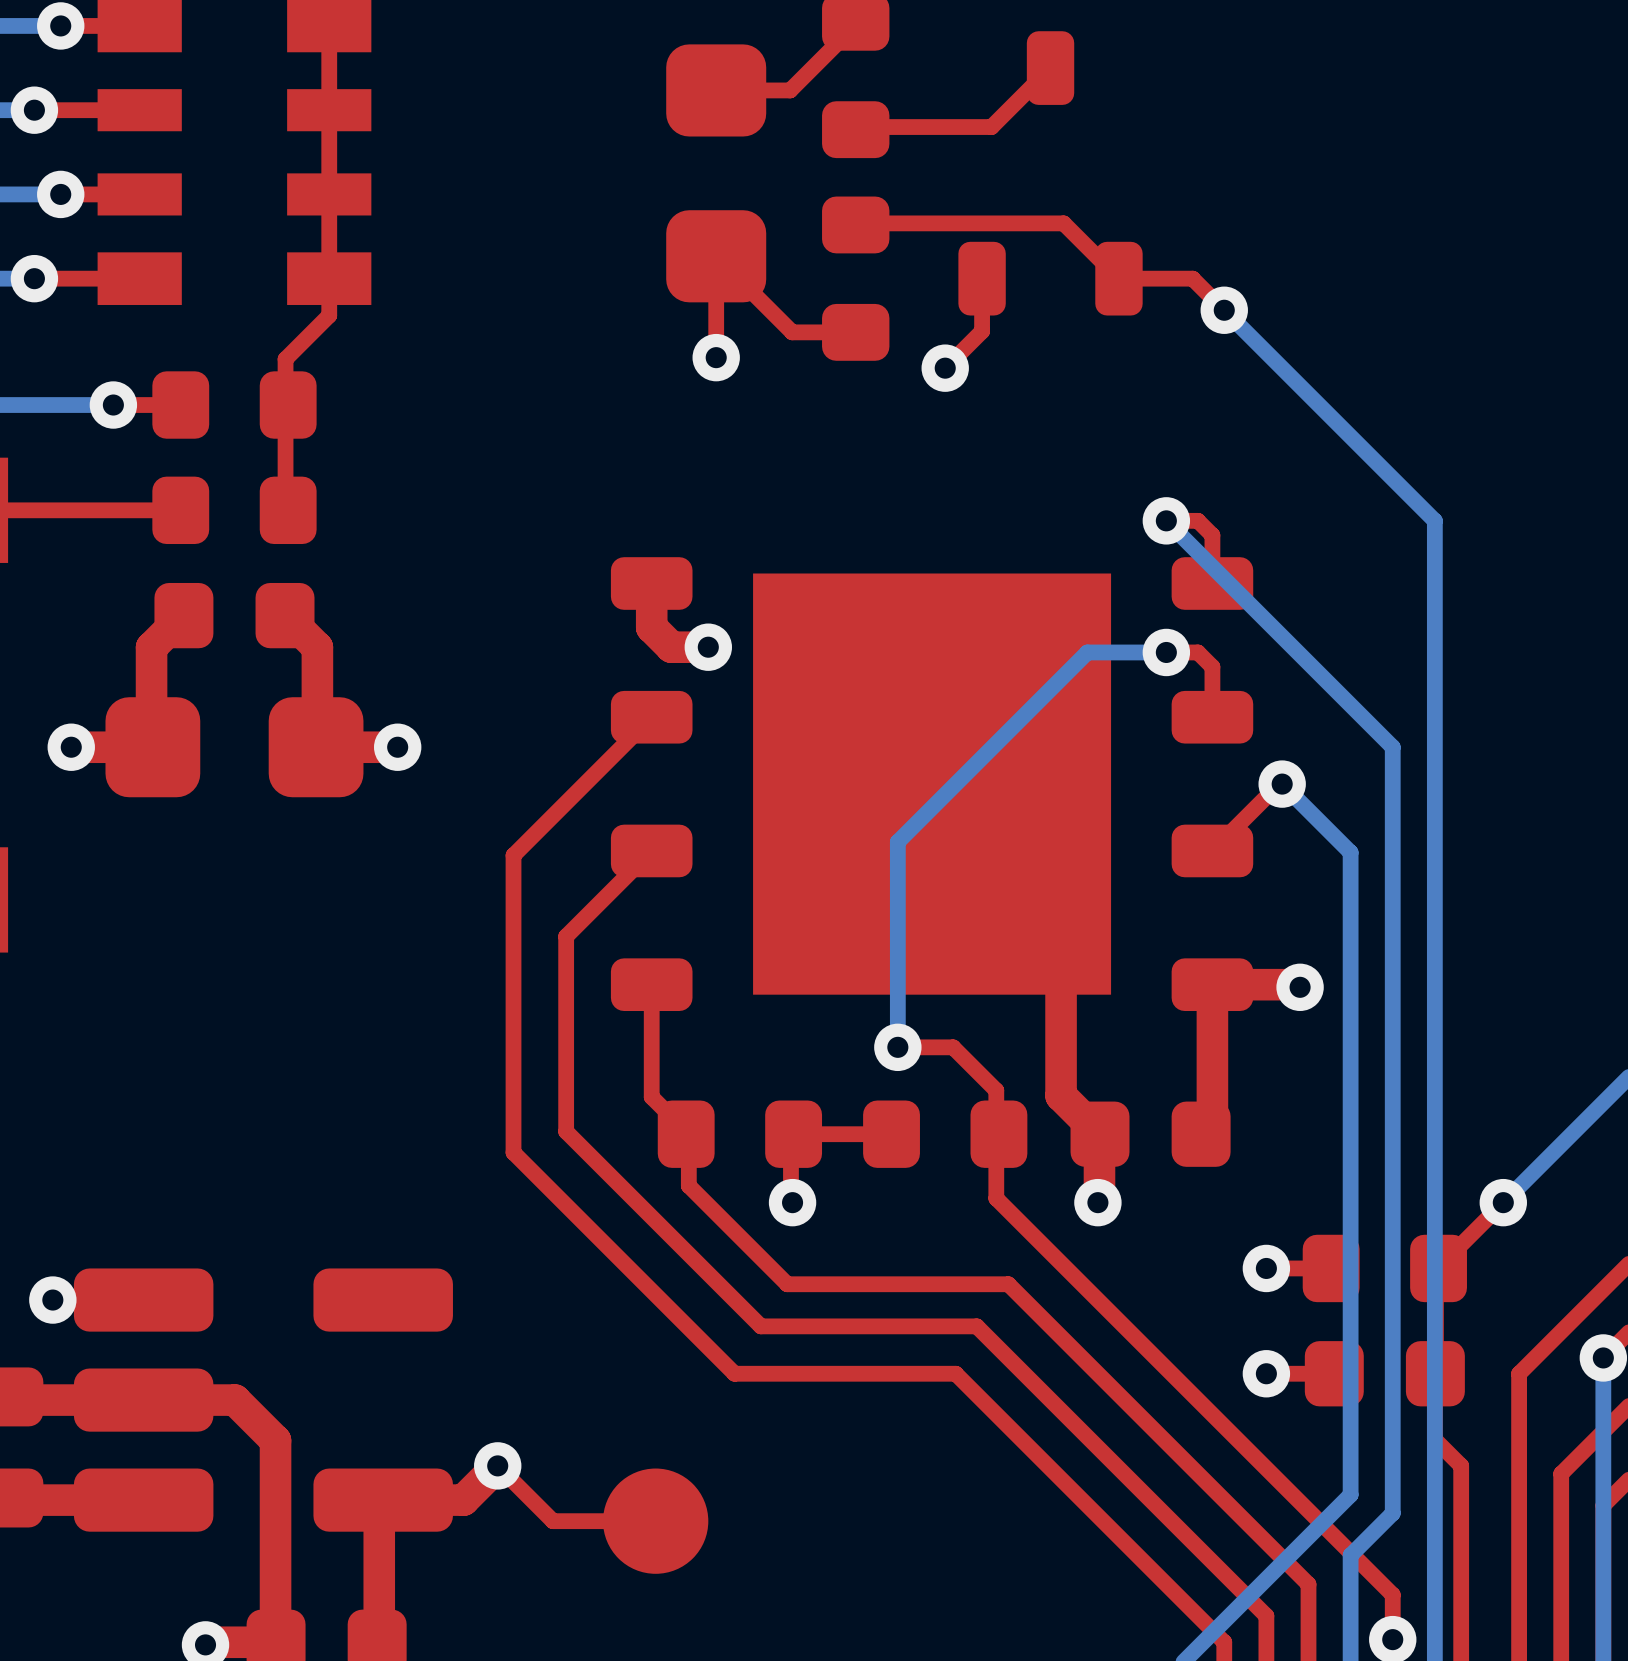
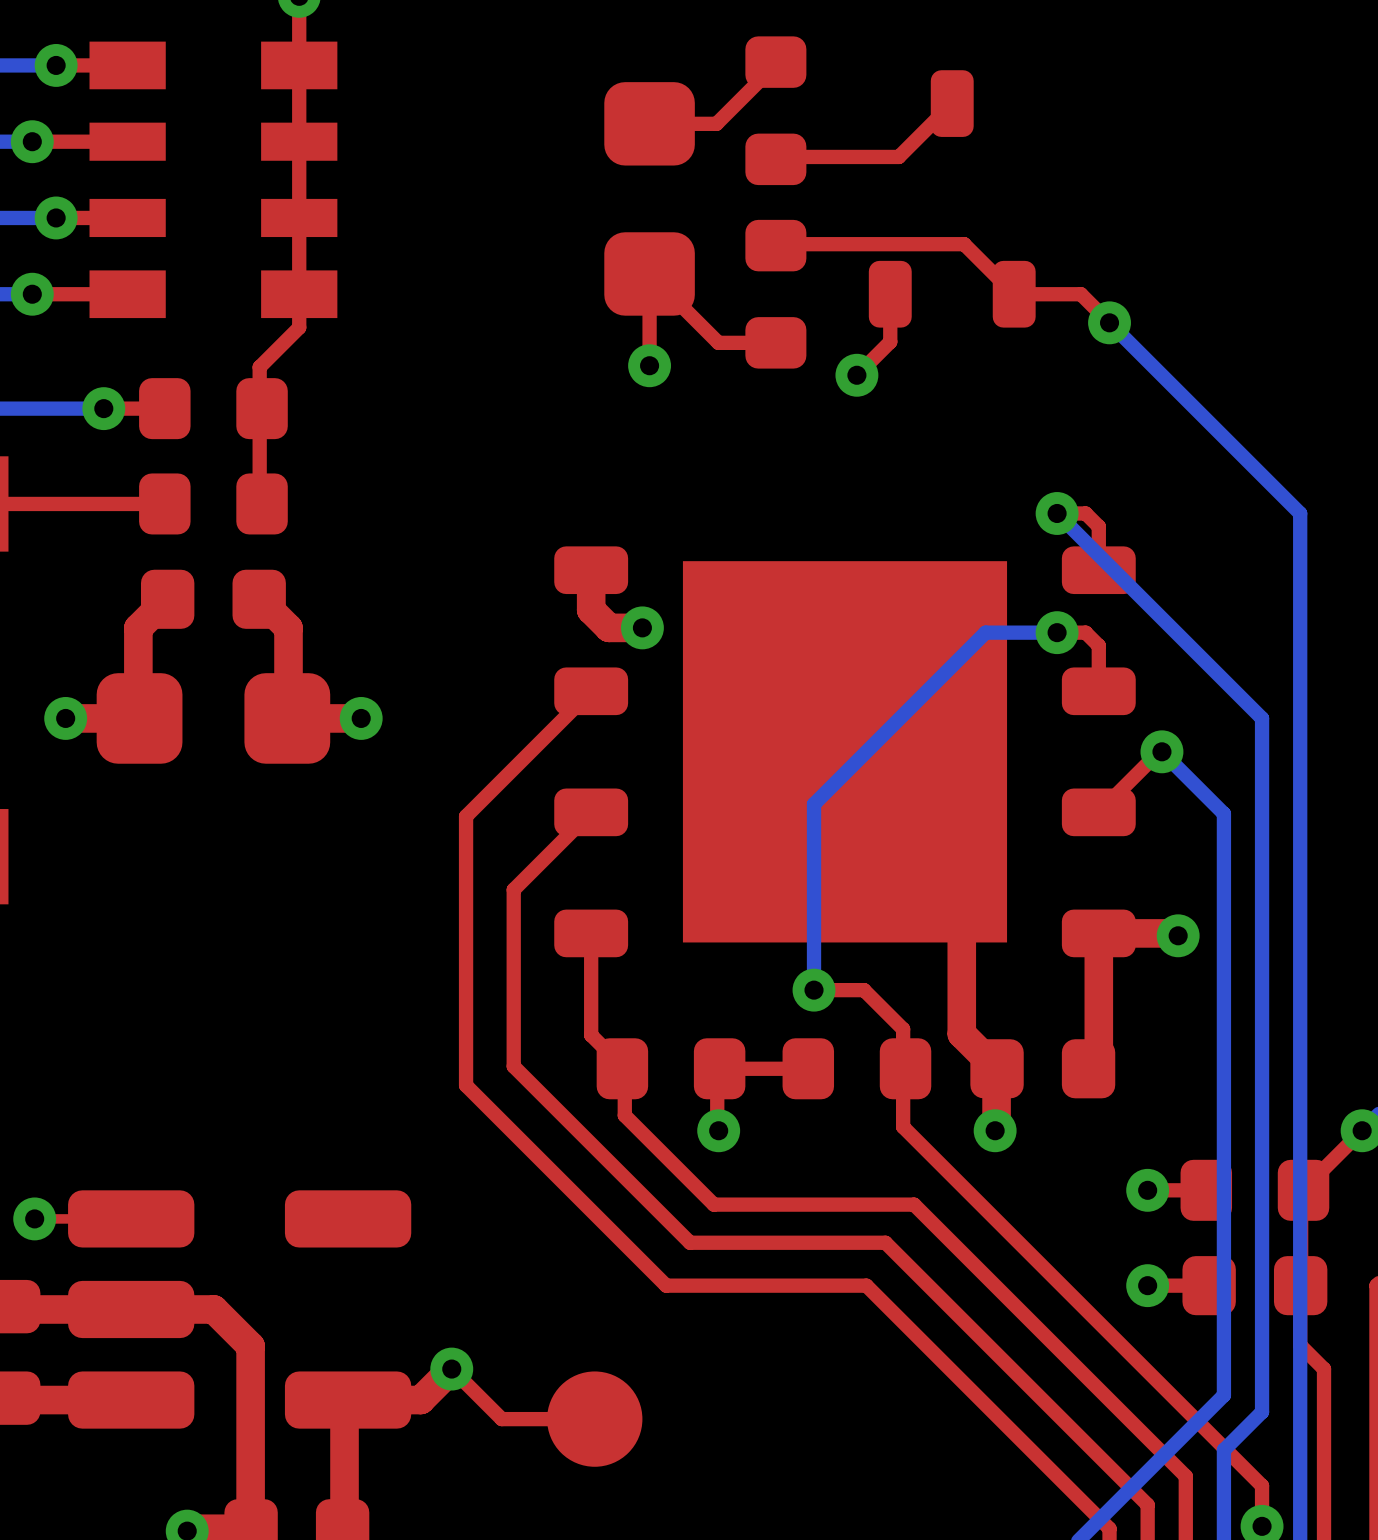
via position: (52, 1300) -> (34, 1218)

